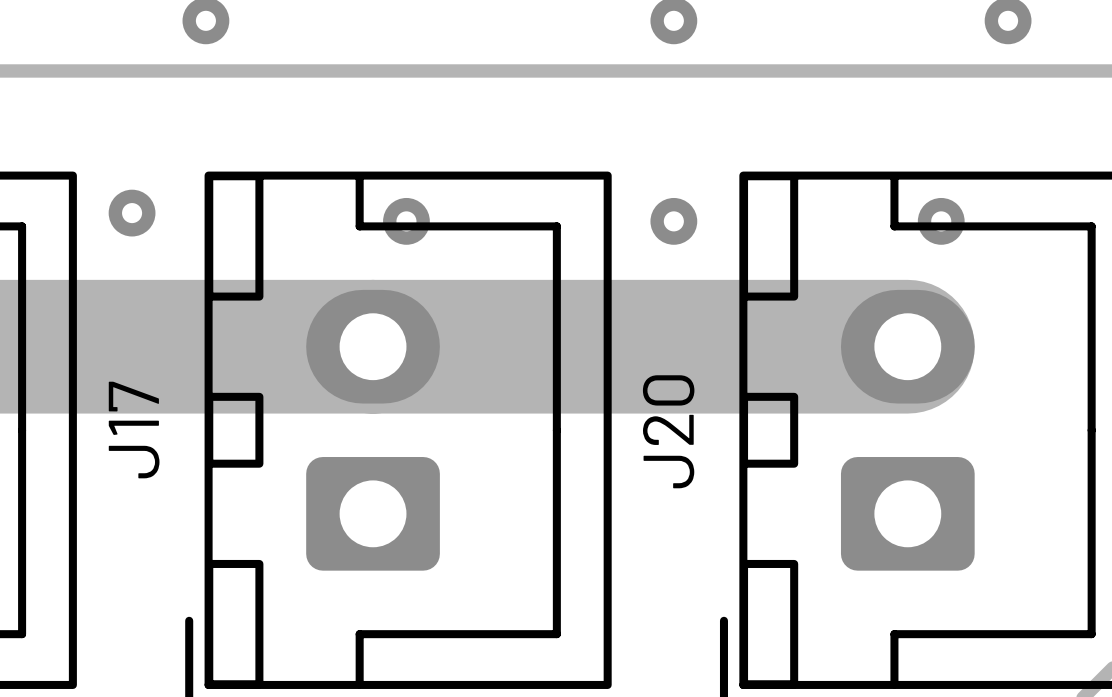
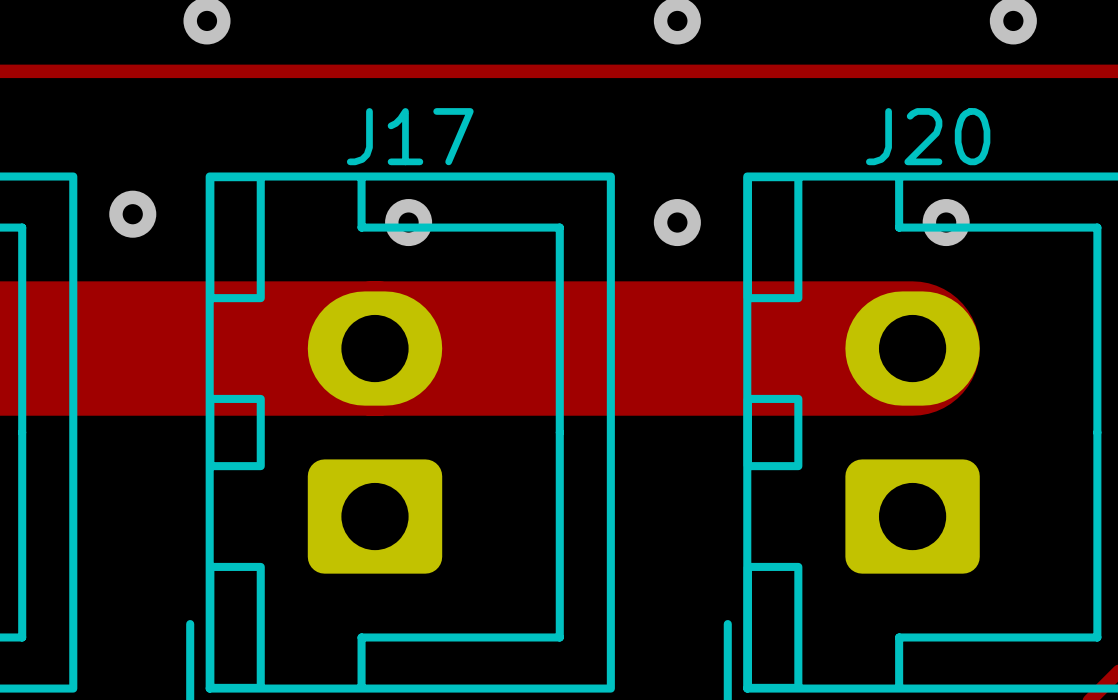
J17 name rotation: 0° (134, 430) -> 90° clockwise (410, 136)
J17 name position: J17 (134, 430) -> J17 (410, 136)
J20 name rotation: 0° (668, 431) -> 90° clockwise (928, 136)
J20 name position: J20 (668, 431) -> J20 (928, 136)

